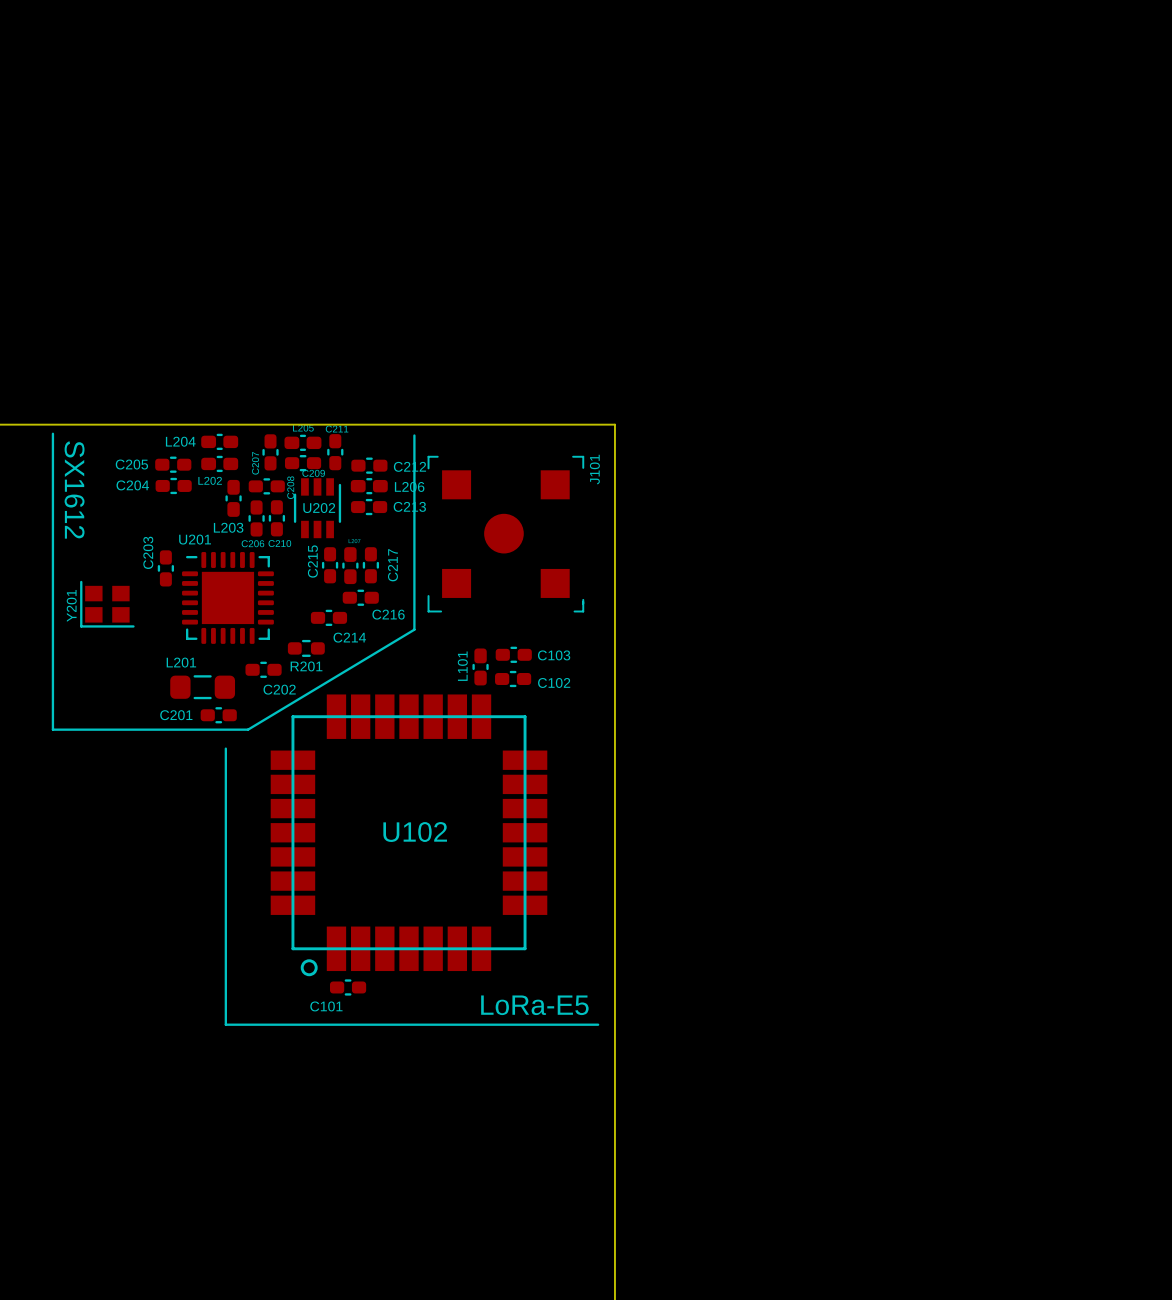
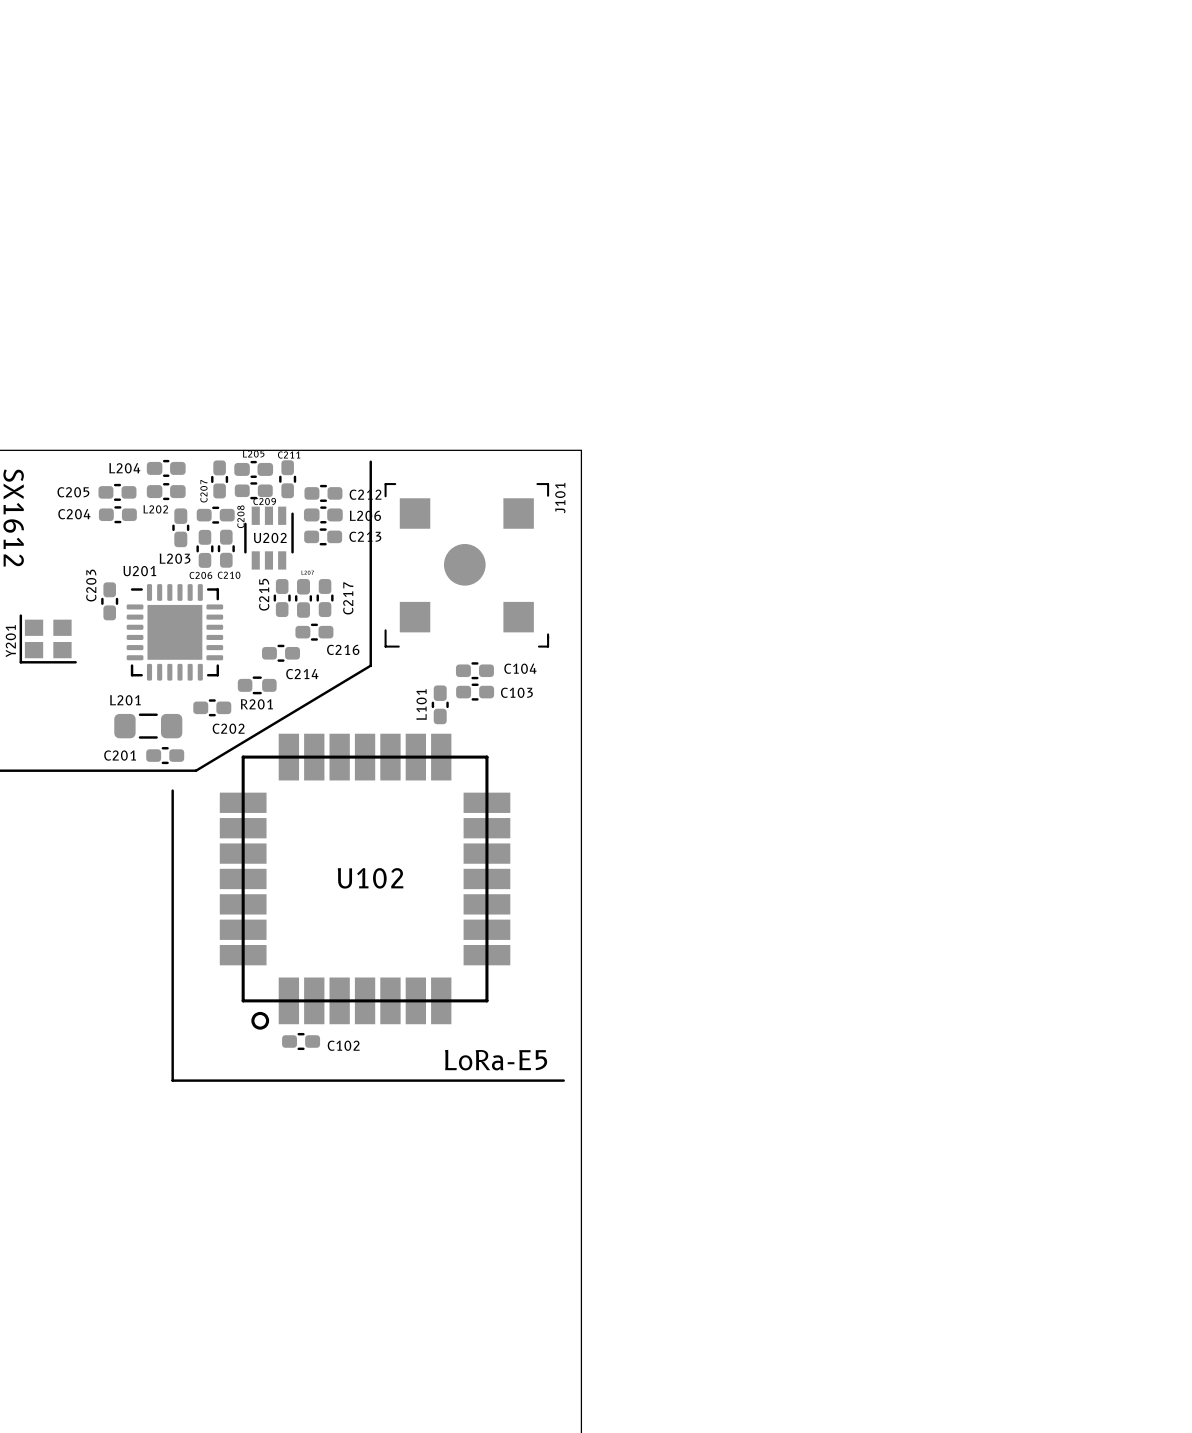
C104: none -> (474, 670)
C102: (513, 678) -> none
C101 name: C101 (326, 1006) -> C102 (343, 1045)

